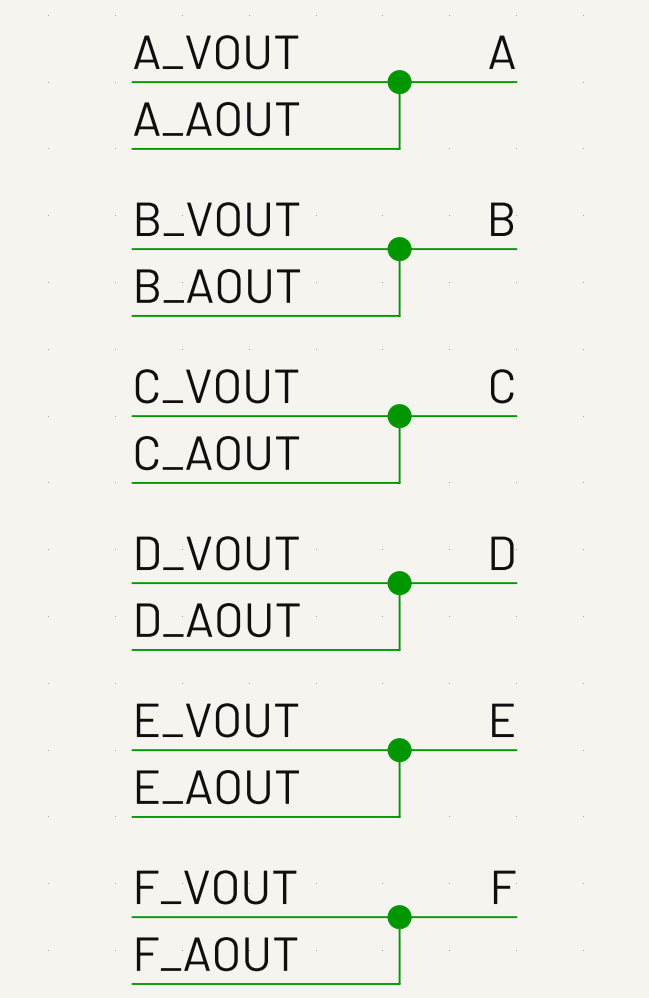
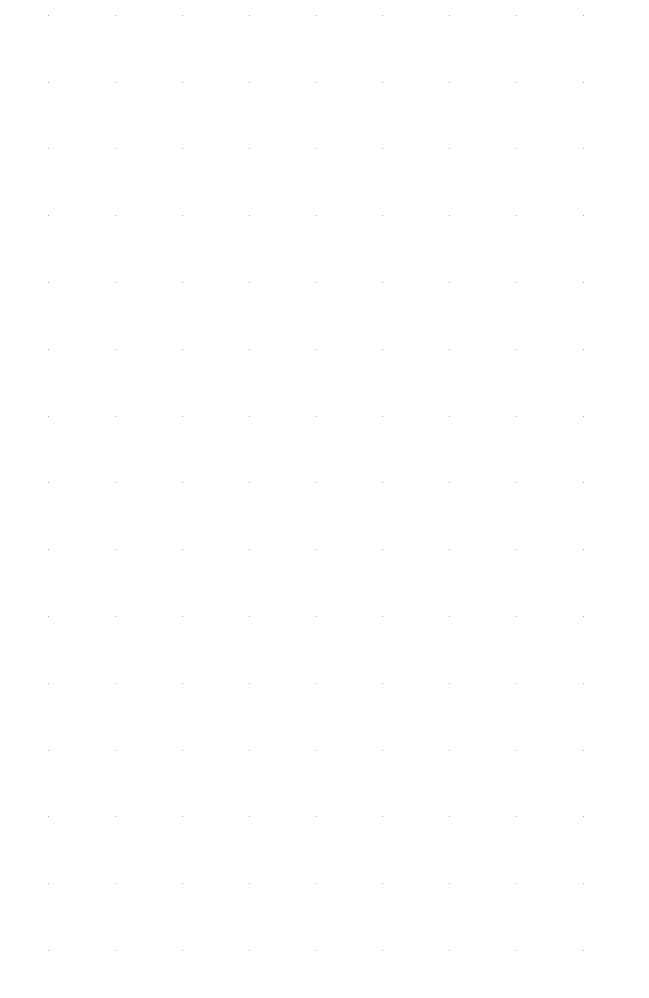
label: A_VOUT (216, 52) -> none
label: A (501, 52) -> none
wire: (132, 82) (516, 82) -> none
wire: (399, 82) (399, 148) (132, 148) -> none
junction: (399, 82) -> none
label: A_AOUT (216, 119) -> none
label: B_VOUT (218, 219) -> none
label: B (502, 219) -> none
wire: (132, 249) (516, 249) -> none
wire: (399, 249) (399, 315) (132, 315) -> none
junction: (399, 249) -> none
label: B_AOUT (218, 286) -> none
label: C_VOUT (217, 386) -> none
label: C (502, 386) -> none
wire: (132, 416) (516, 416) -> none
wire: (399, 416) (399, 482) (132, 482) -> none
junction: (399, 416) -> none
label: C_AOUT (217, 453) -> none
label: D_VOUT (217, 553) -> none
label: D (502, 553) -> none
wire: (132, 583) (516, 583) -> none
wire: (399, 583) (399, 649) (132, 649) -> none
junction: (399, 583) -> none
label: D_AOUT (218, 620) -> none
label: E_VOUT (217, 720) -> none
label: E (502, 720) -> none
wire: (132, 750) (516, 750) -> none
wire: (399, 750) (399, 816) (132, 816) -> none
junction: (399, 750) -> none
label: E_AOUT (217, 787) -> none
label: F_VOUT (216, 887) -> none
label: F (504, 887) -> none
wire: (132, 917) (516, 917) -> none
wire: (399, 917) (399, 983) (132, 983) -> none
junction: (399, 917) -> none
label: F_AOUT (217, 954) -> none

